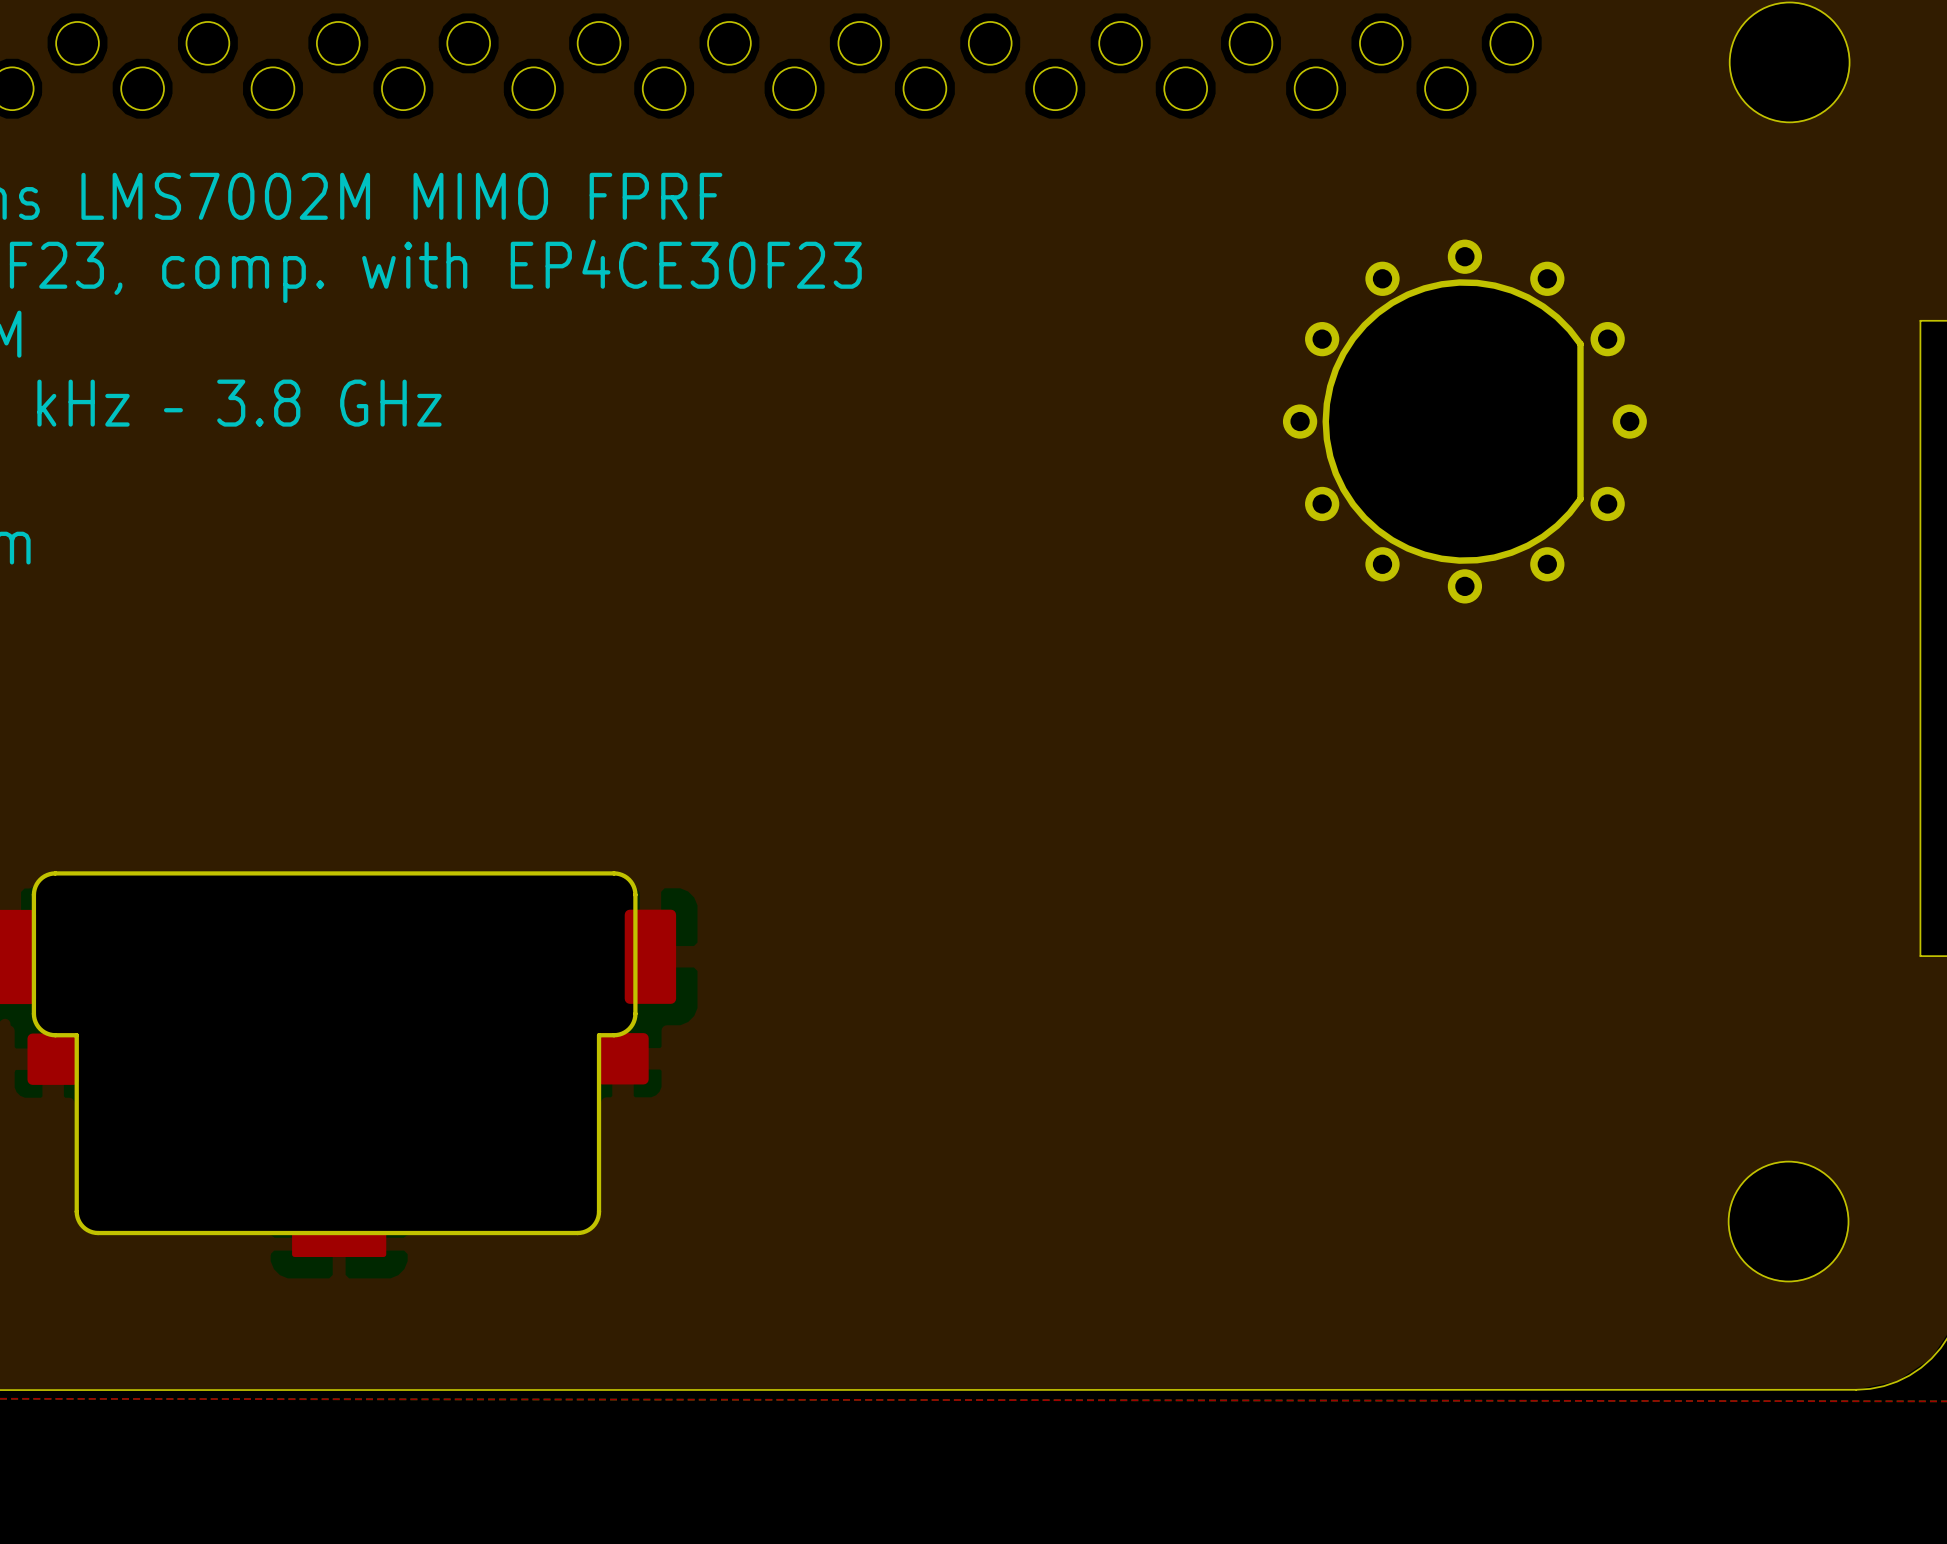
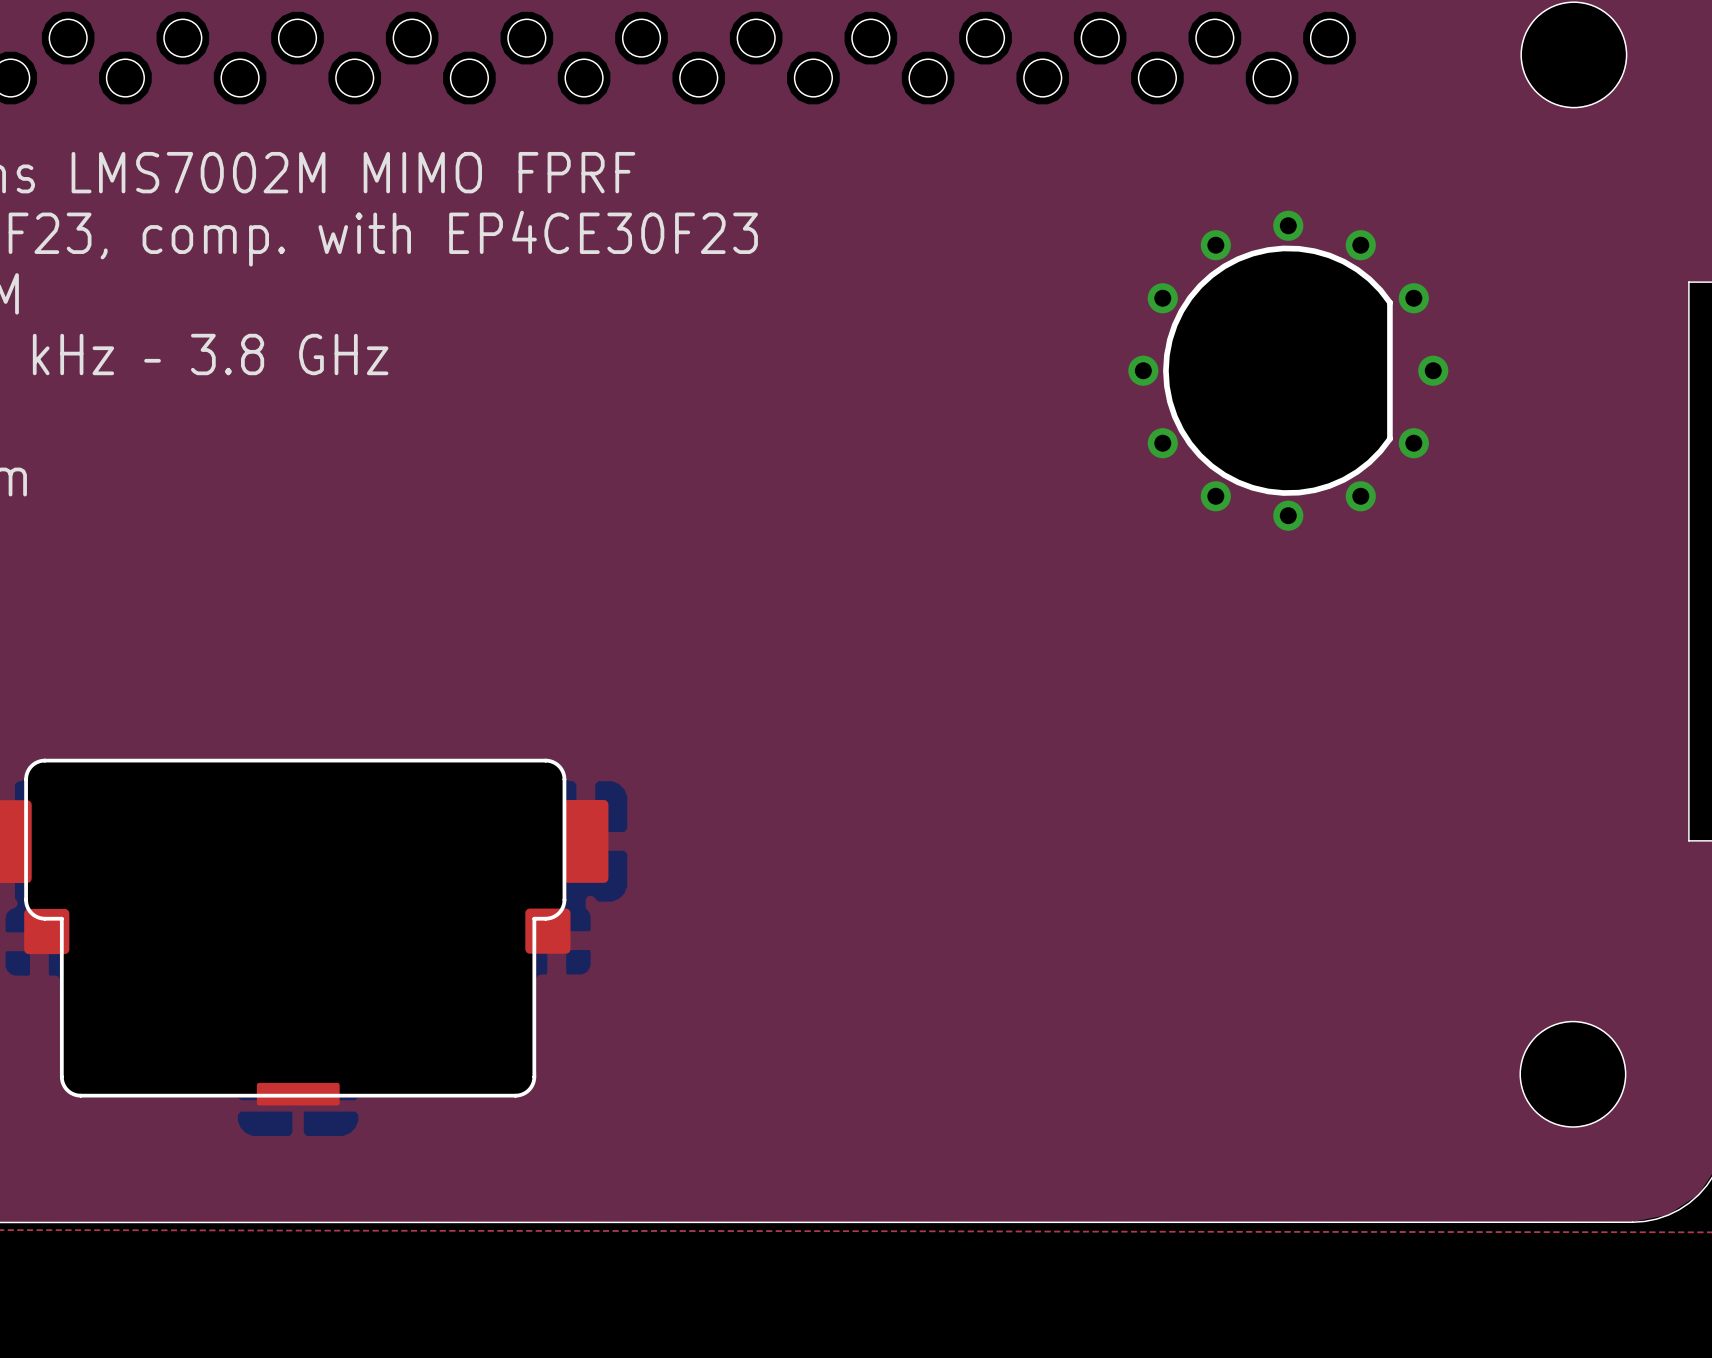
board edge: (55, 873) (614, 873) (624, 876) (631, 881) (635, 892) (635, 1016) (631, 1026) (624, 1032) (616, 1035) (599, 1035) (599, 1211) (596, 1222) (588, 1230) (577, 1233) (98, 1233) (87, 1230) (79, 1222) (76, 1211) (76, 1035) (47, 1033) (38, 1026) (34, 1016) (34, 892) (36, 884) (42, 877) (55, 873) -> (44, 760) (33, 764) (26, 776) (26, 902) (29, 911) (37, 917) (61, 918) (61, 1076) (63, 1084) (69, 1091) (80, 1095) (515, 1095) (522, 1094) (530, 1088) (534, 1076) (534, 918) (548, 918) (555, 916) (560, 911) (564, 902) (564, 779) (563, 772) (557, 764) (545, 760) (44, 760)
part position: (650, 956) -> (585, 841)

